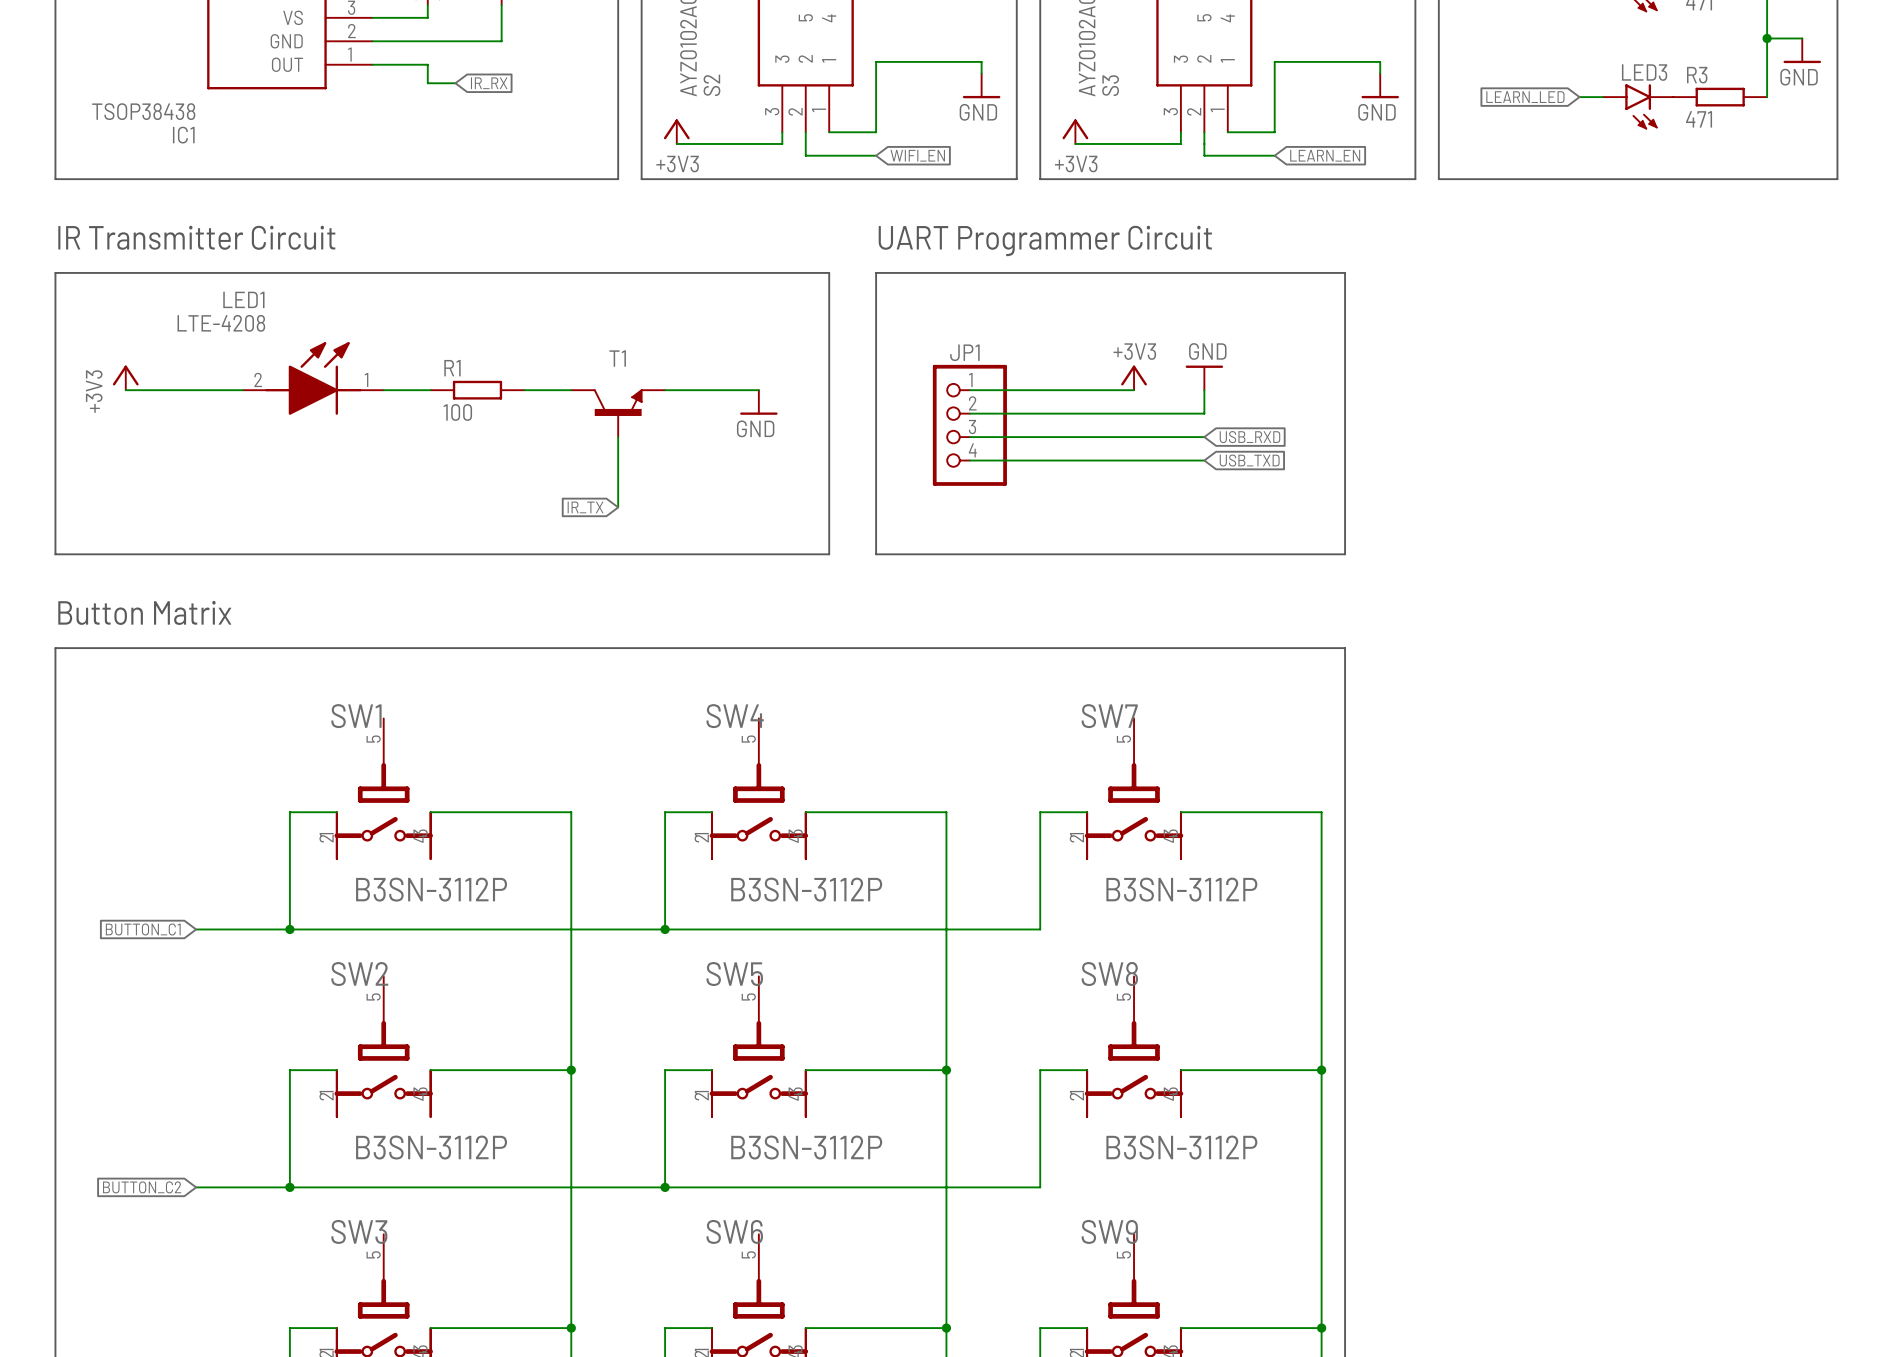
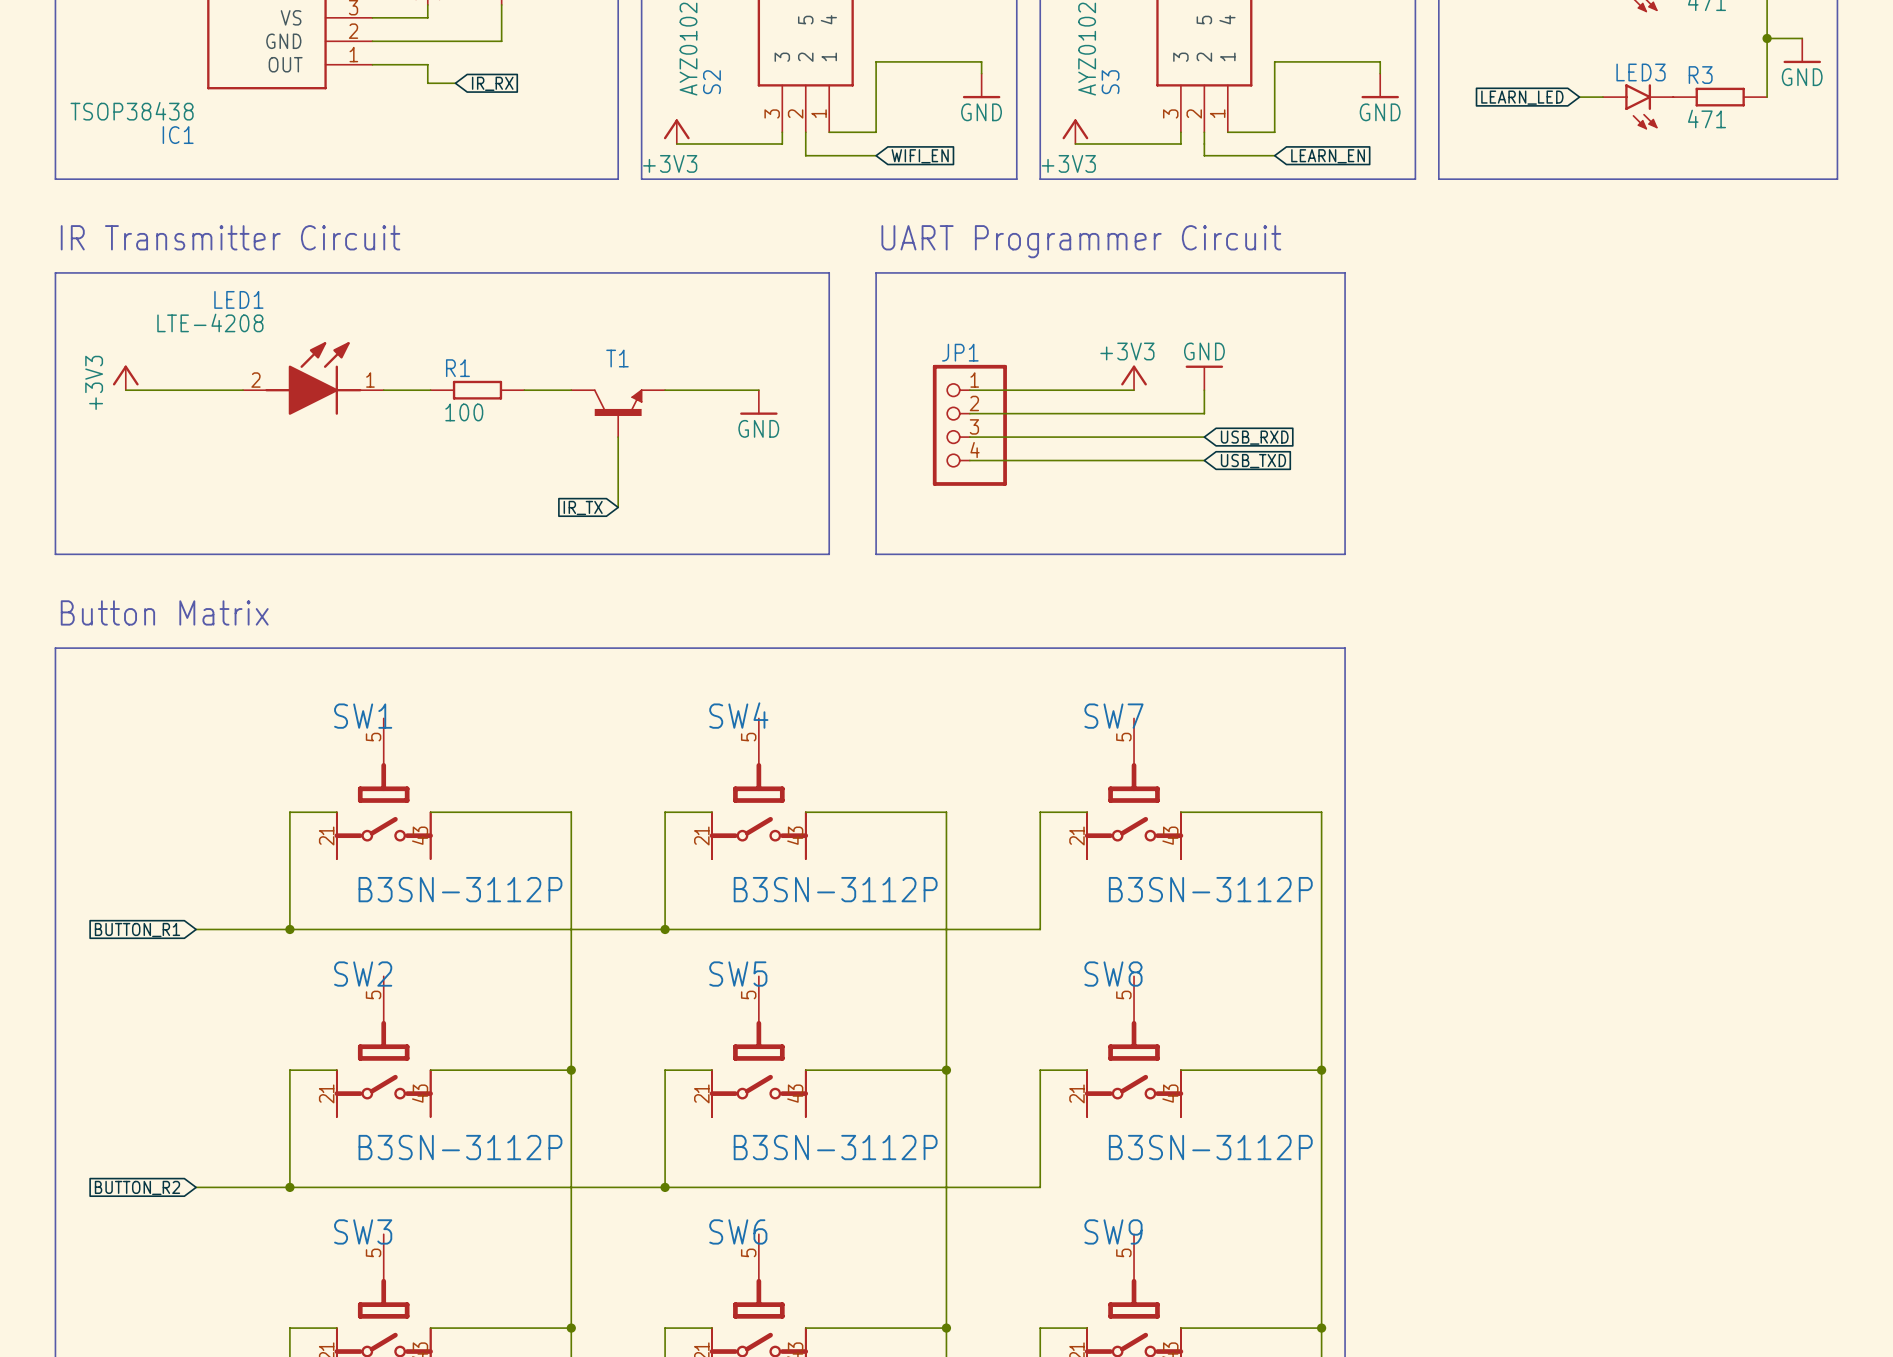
global label: BUTTON_C1 (143, 929) -> BUTTON_R1 (137, 930)
global label: BUTTON_C2 (142, 1187) -> BUTTON_R2 (137, 1187)

